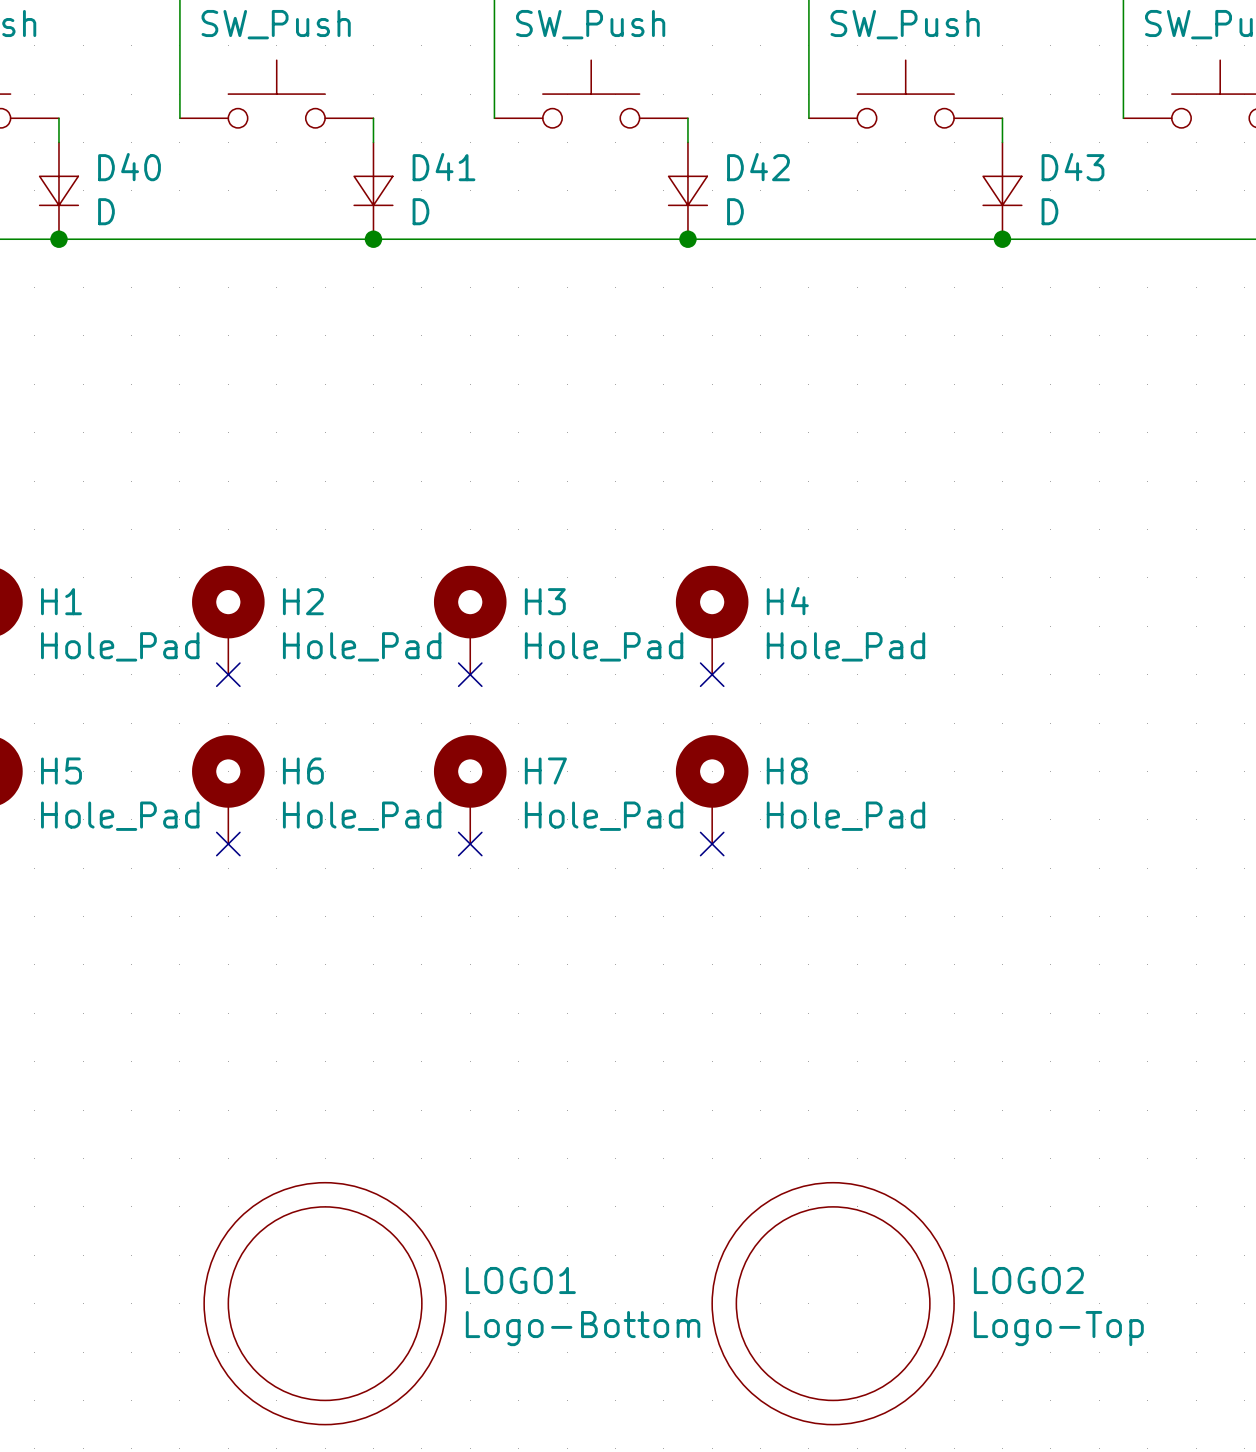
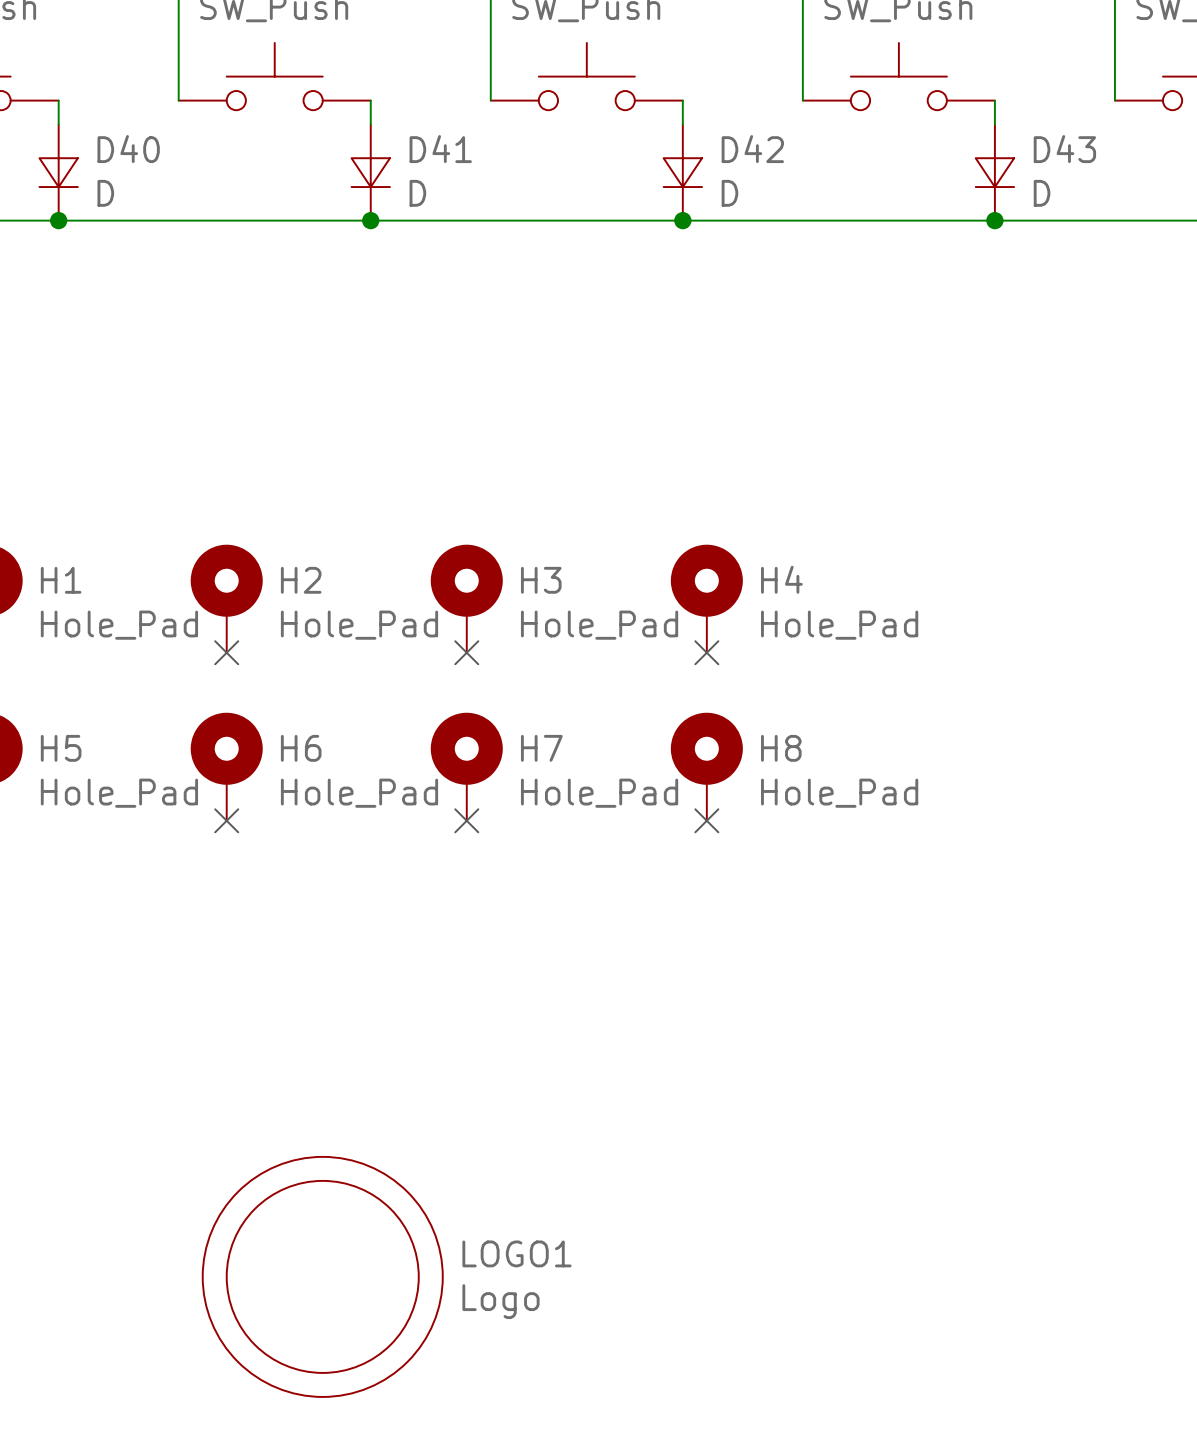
LOGO2: Logo-Top (833, 1303) -> none
LOGO1 value: Logo-Bottom (583, 1328) -> Logo (500, 1301)

